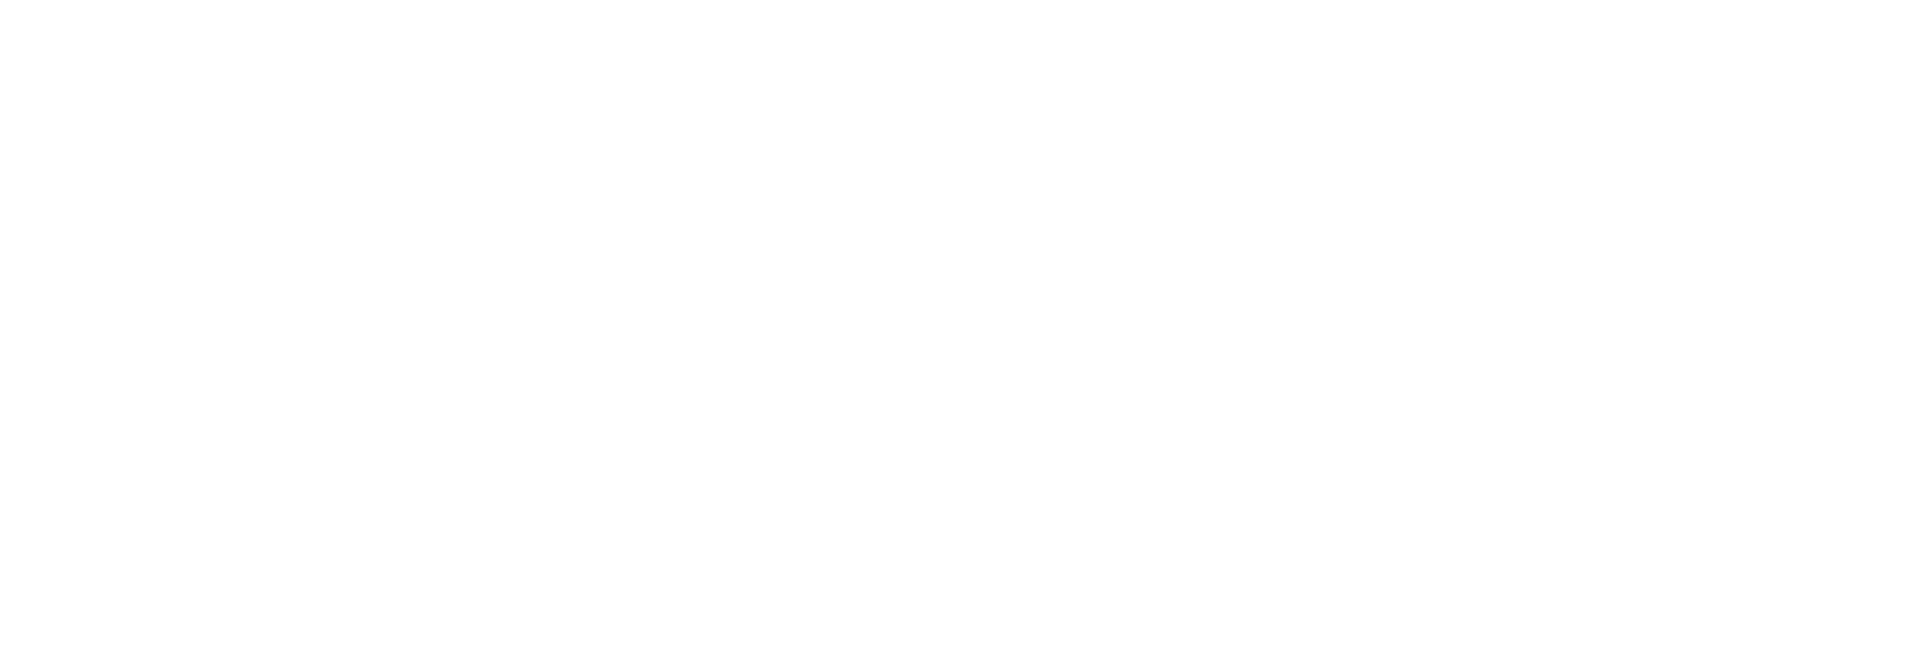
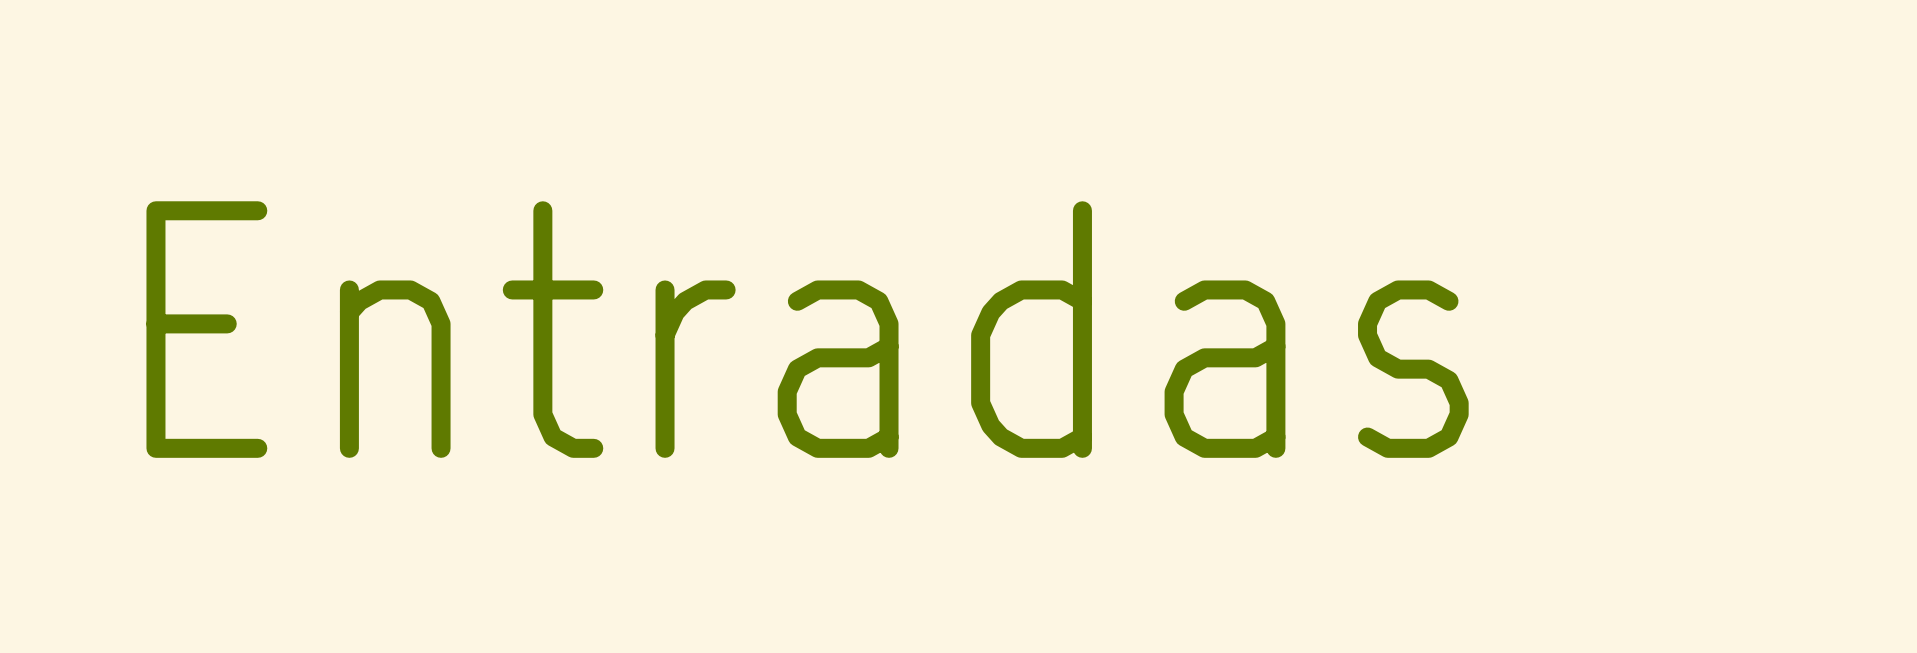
text: none -> Entradas (807, 329)

